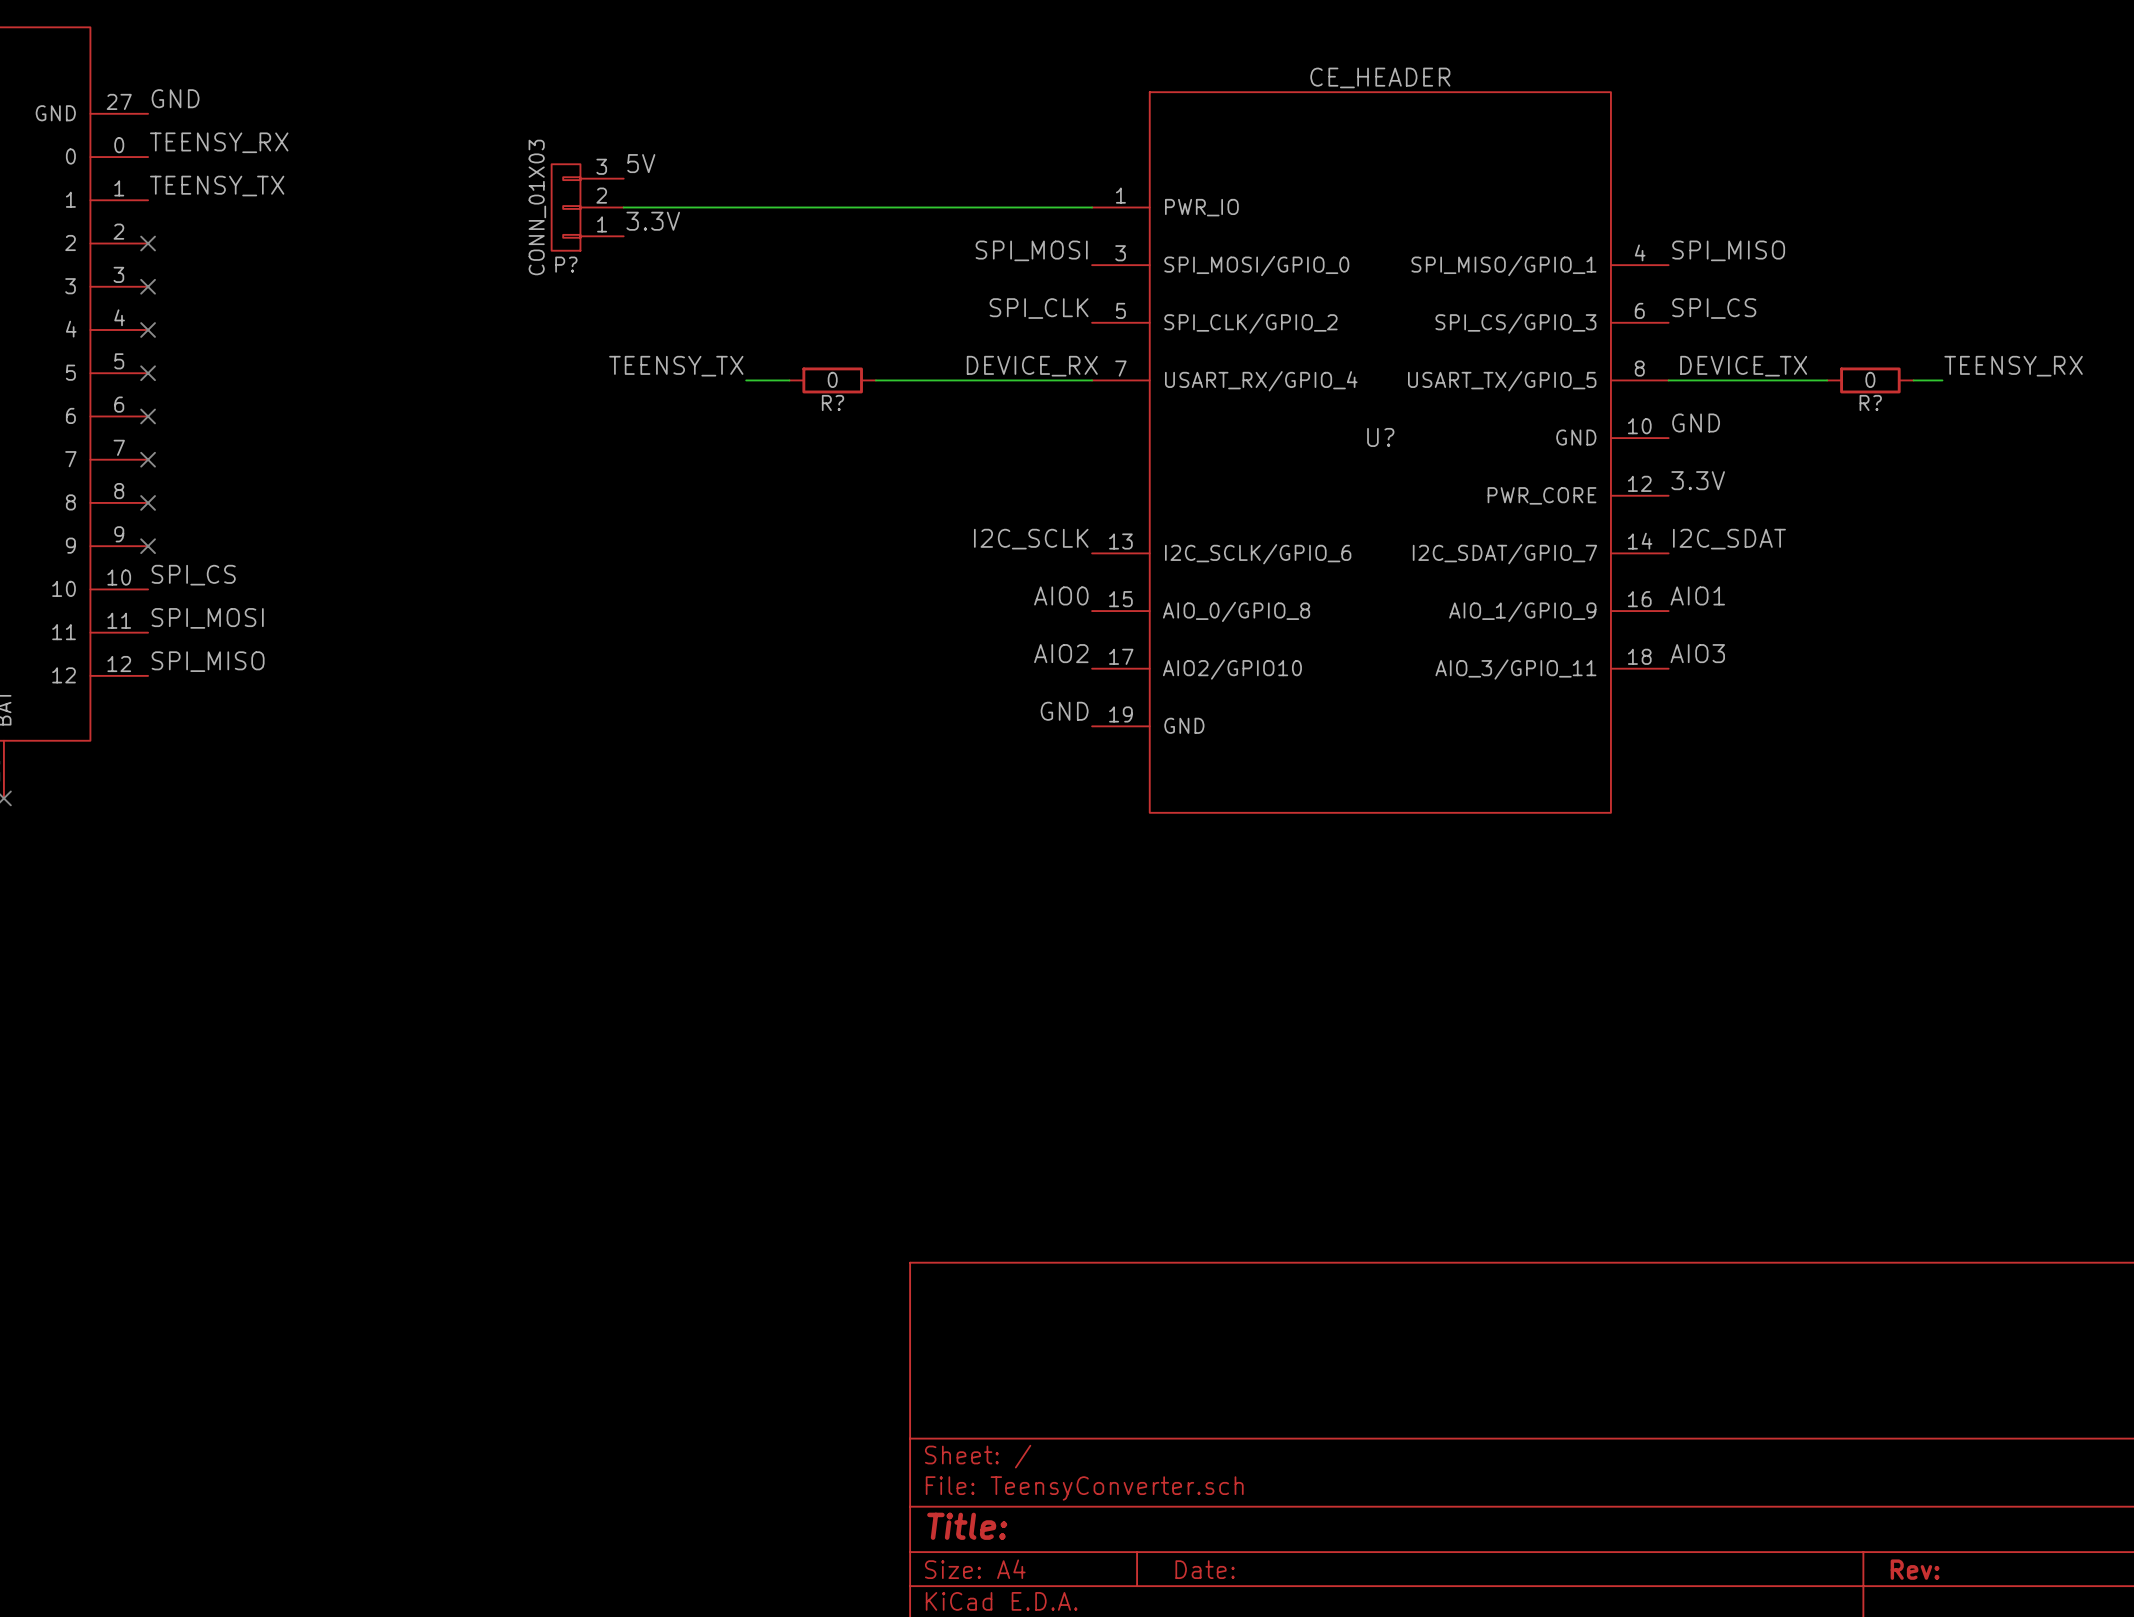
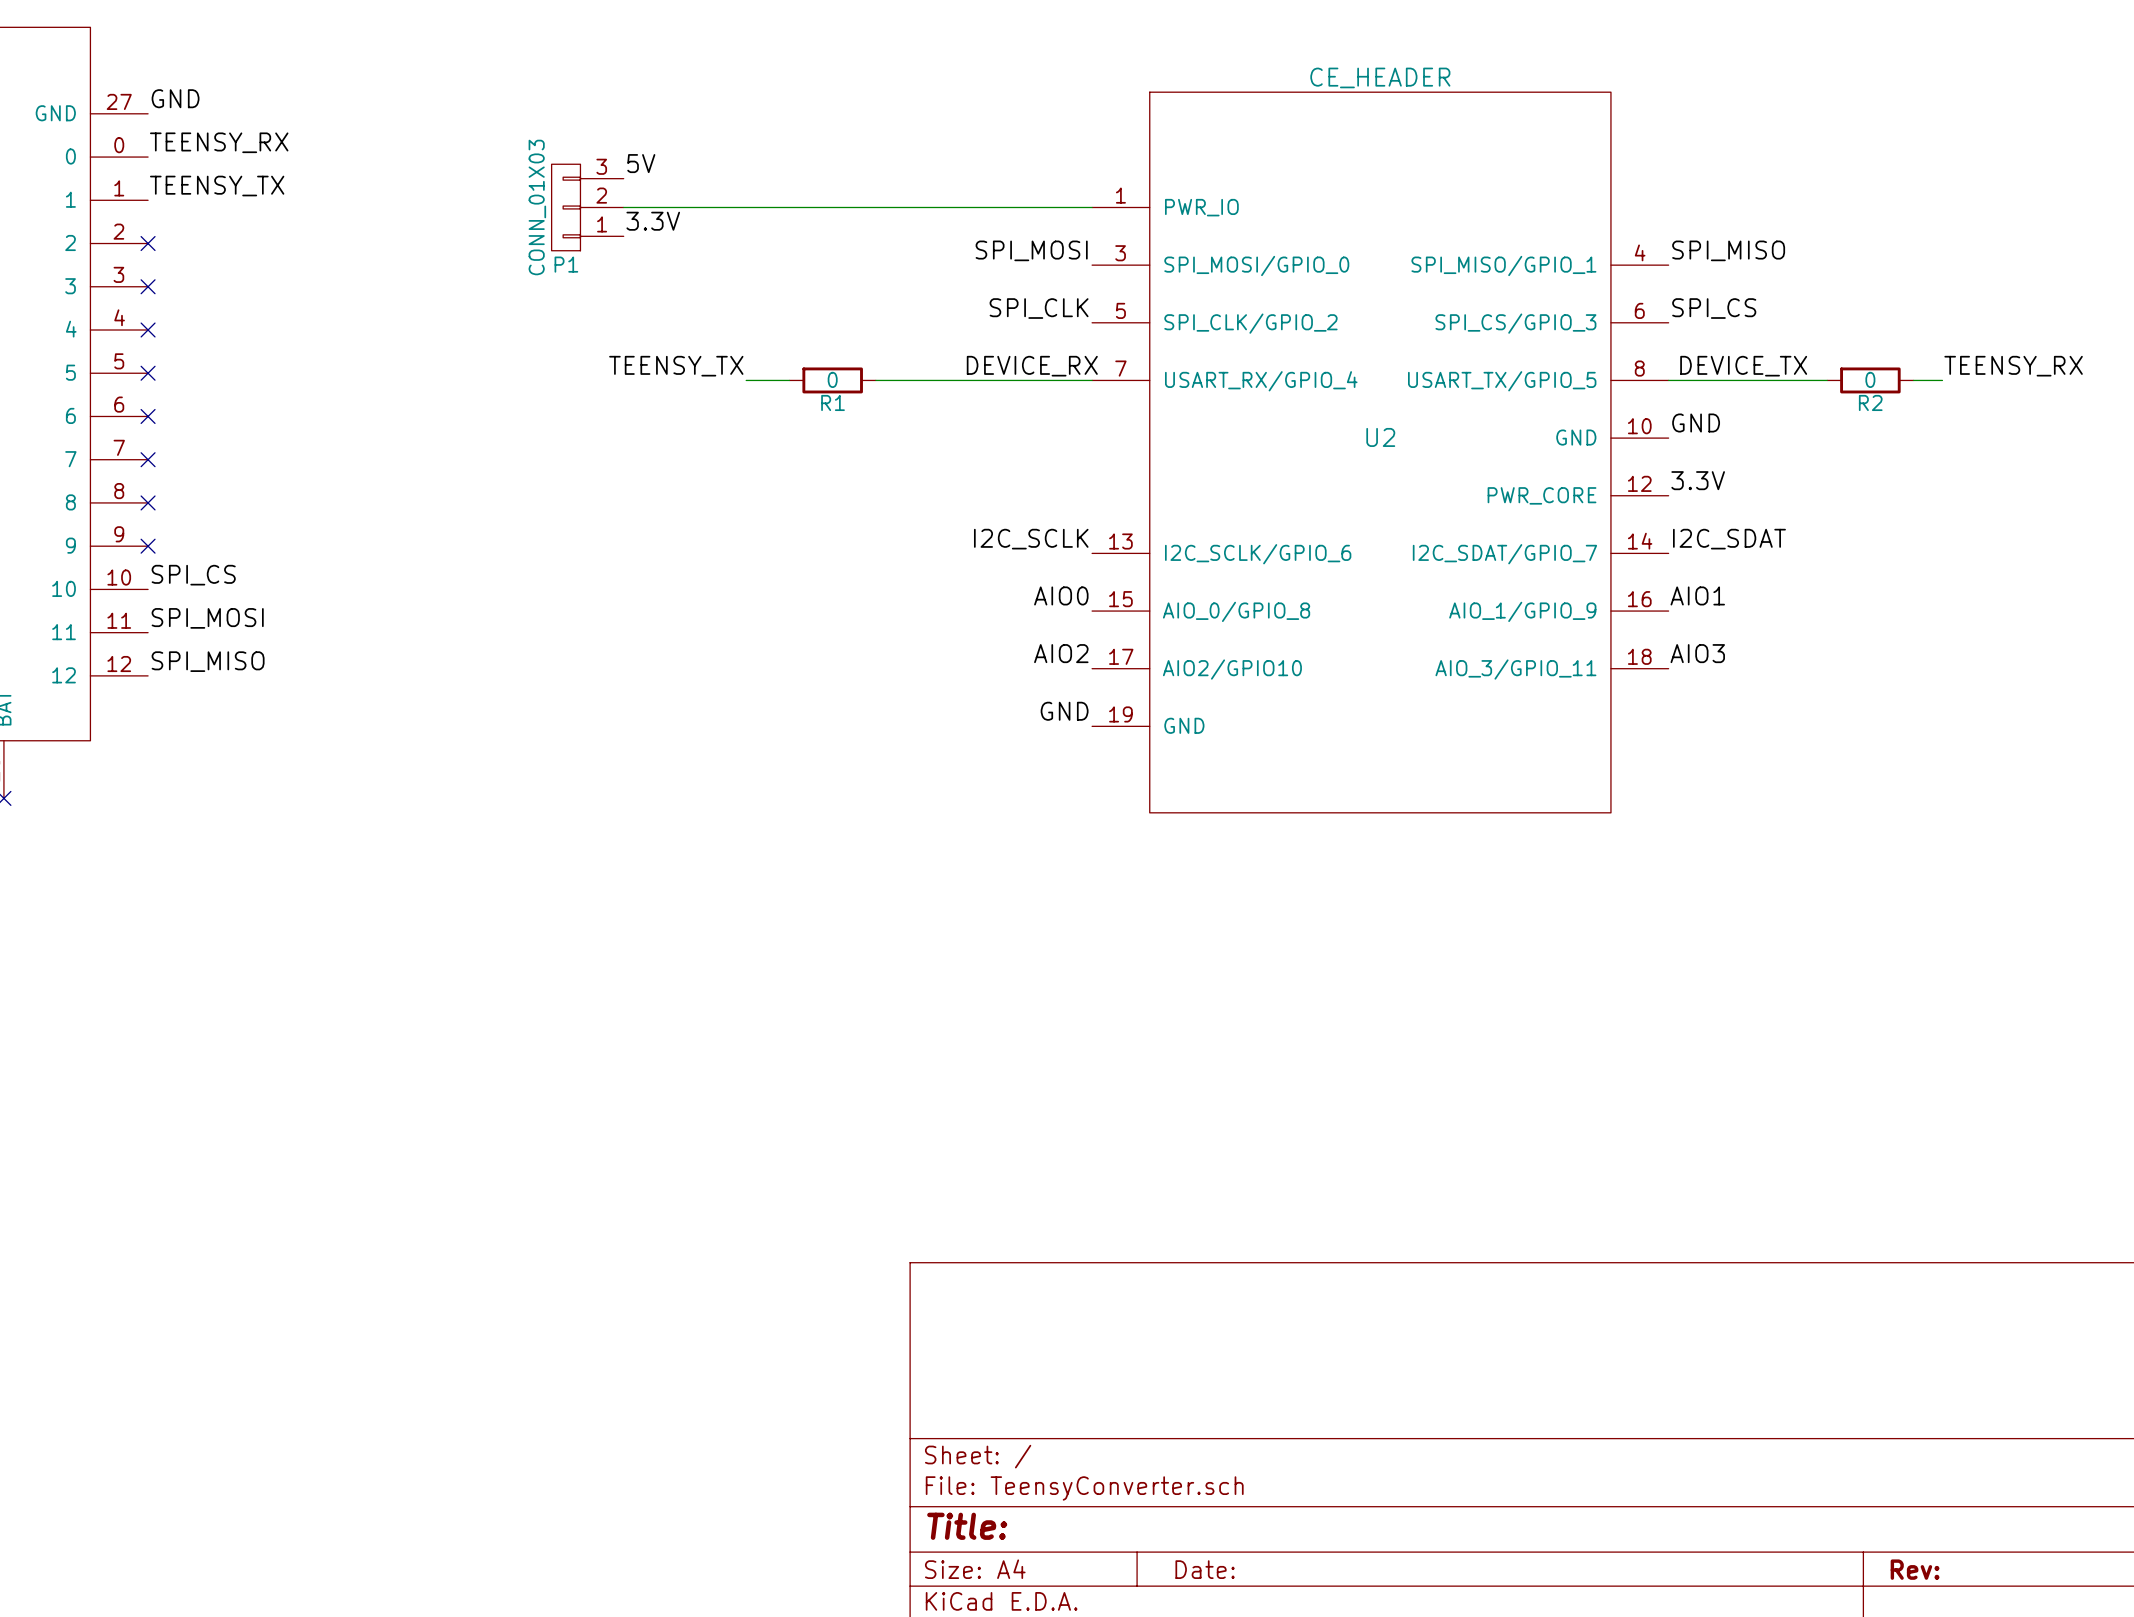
P? name: P? (566, 264) -> P1 (566, 264)
R? name: R? (833, 402) -> R1 (833, 402)
R? name: R? (1870, 402) -> R2 (1870, 402)
U? name: U? (1380, 437) -> U2 (1380, 437)

